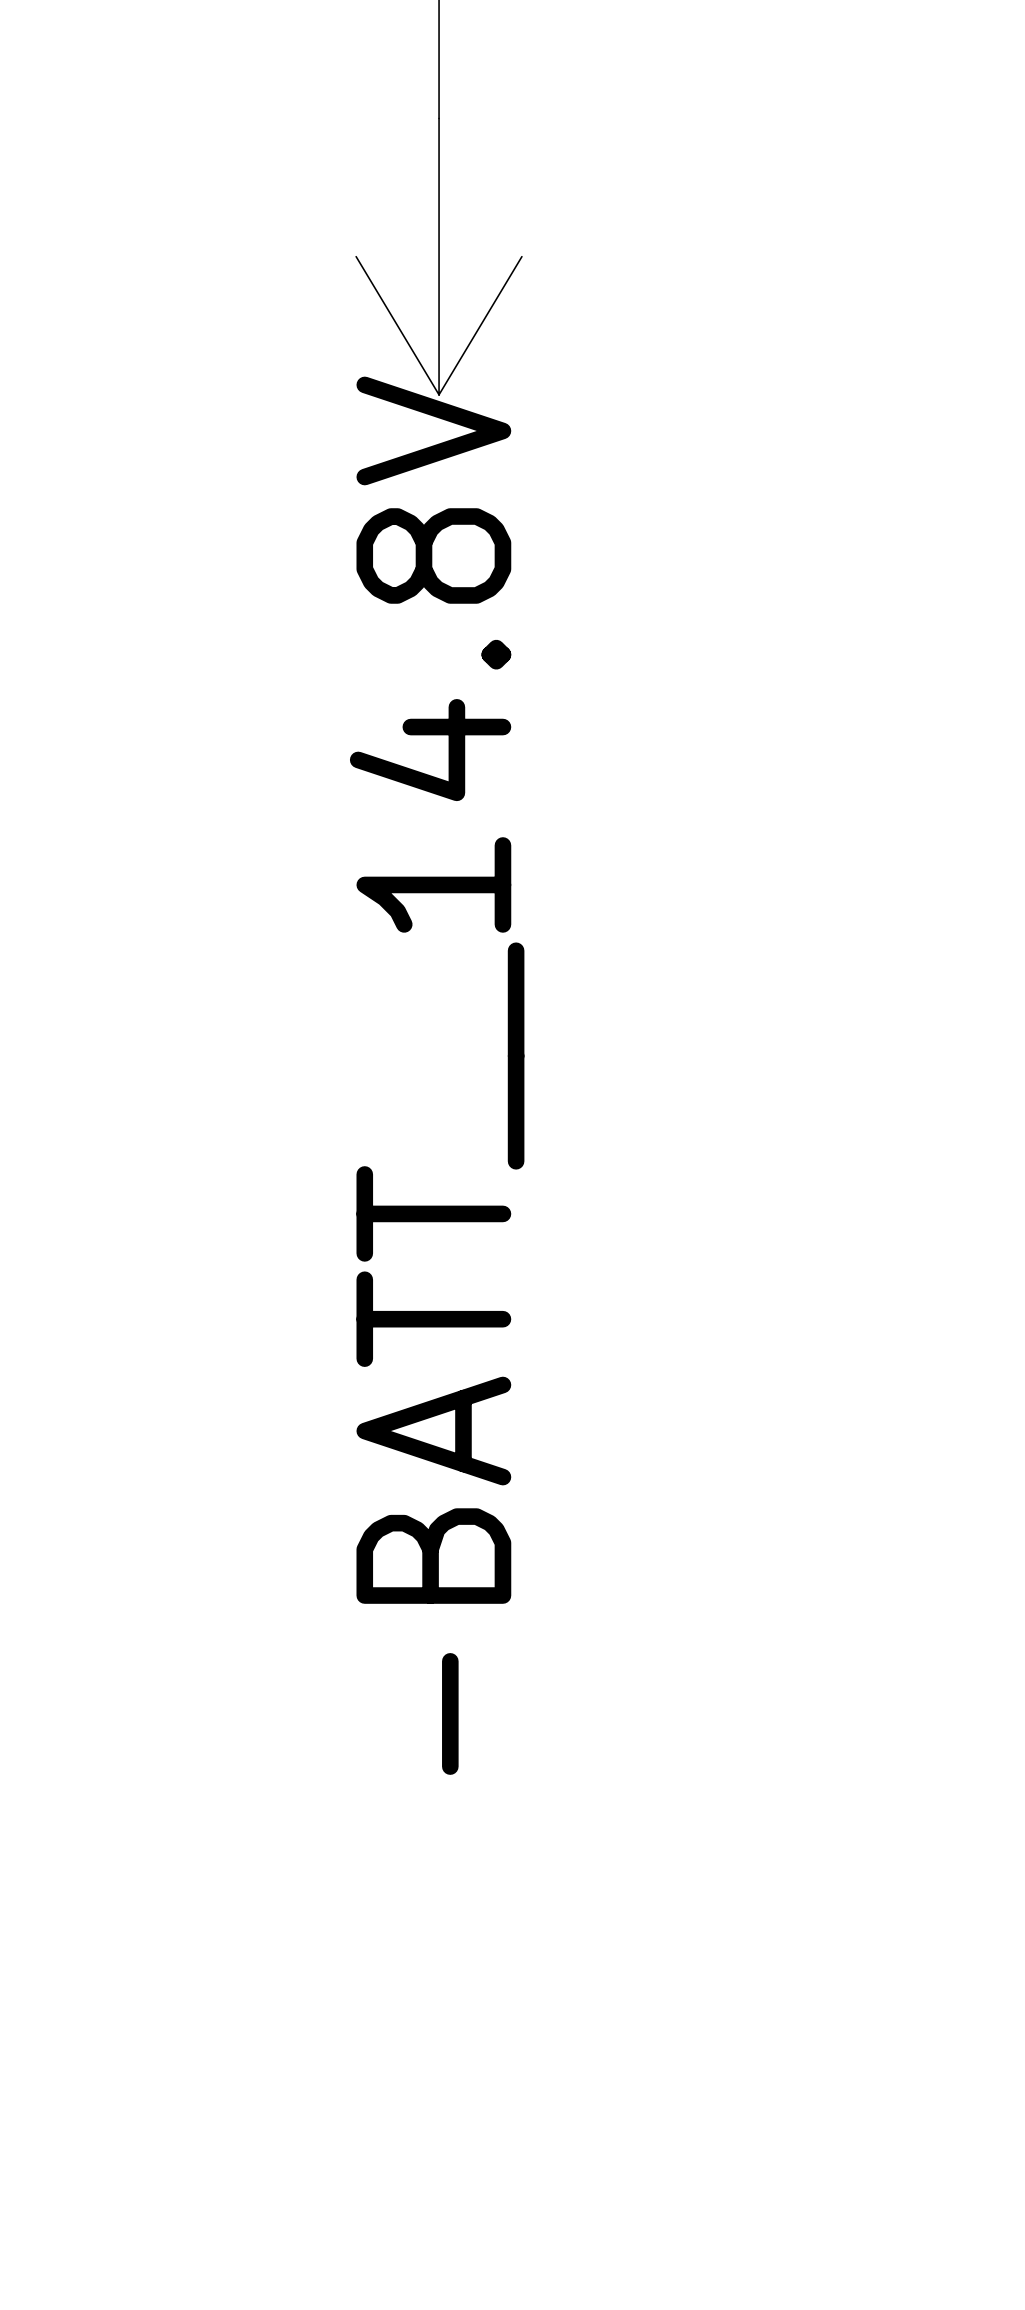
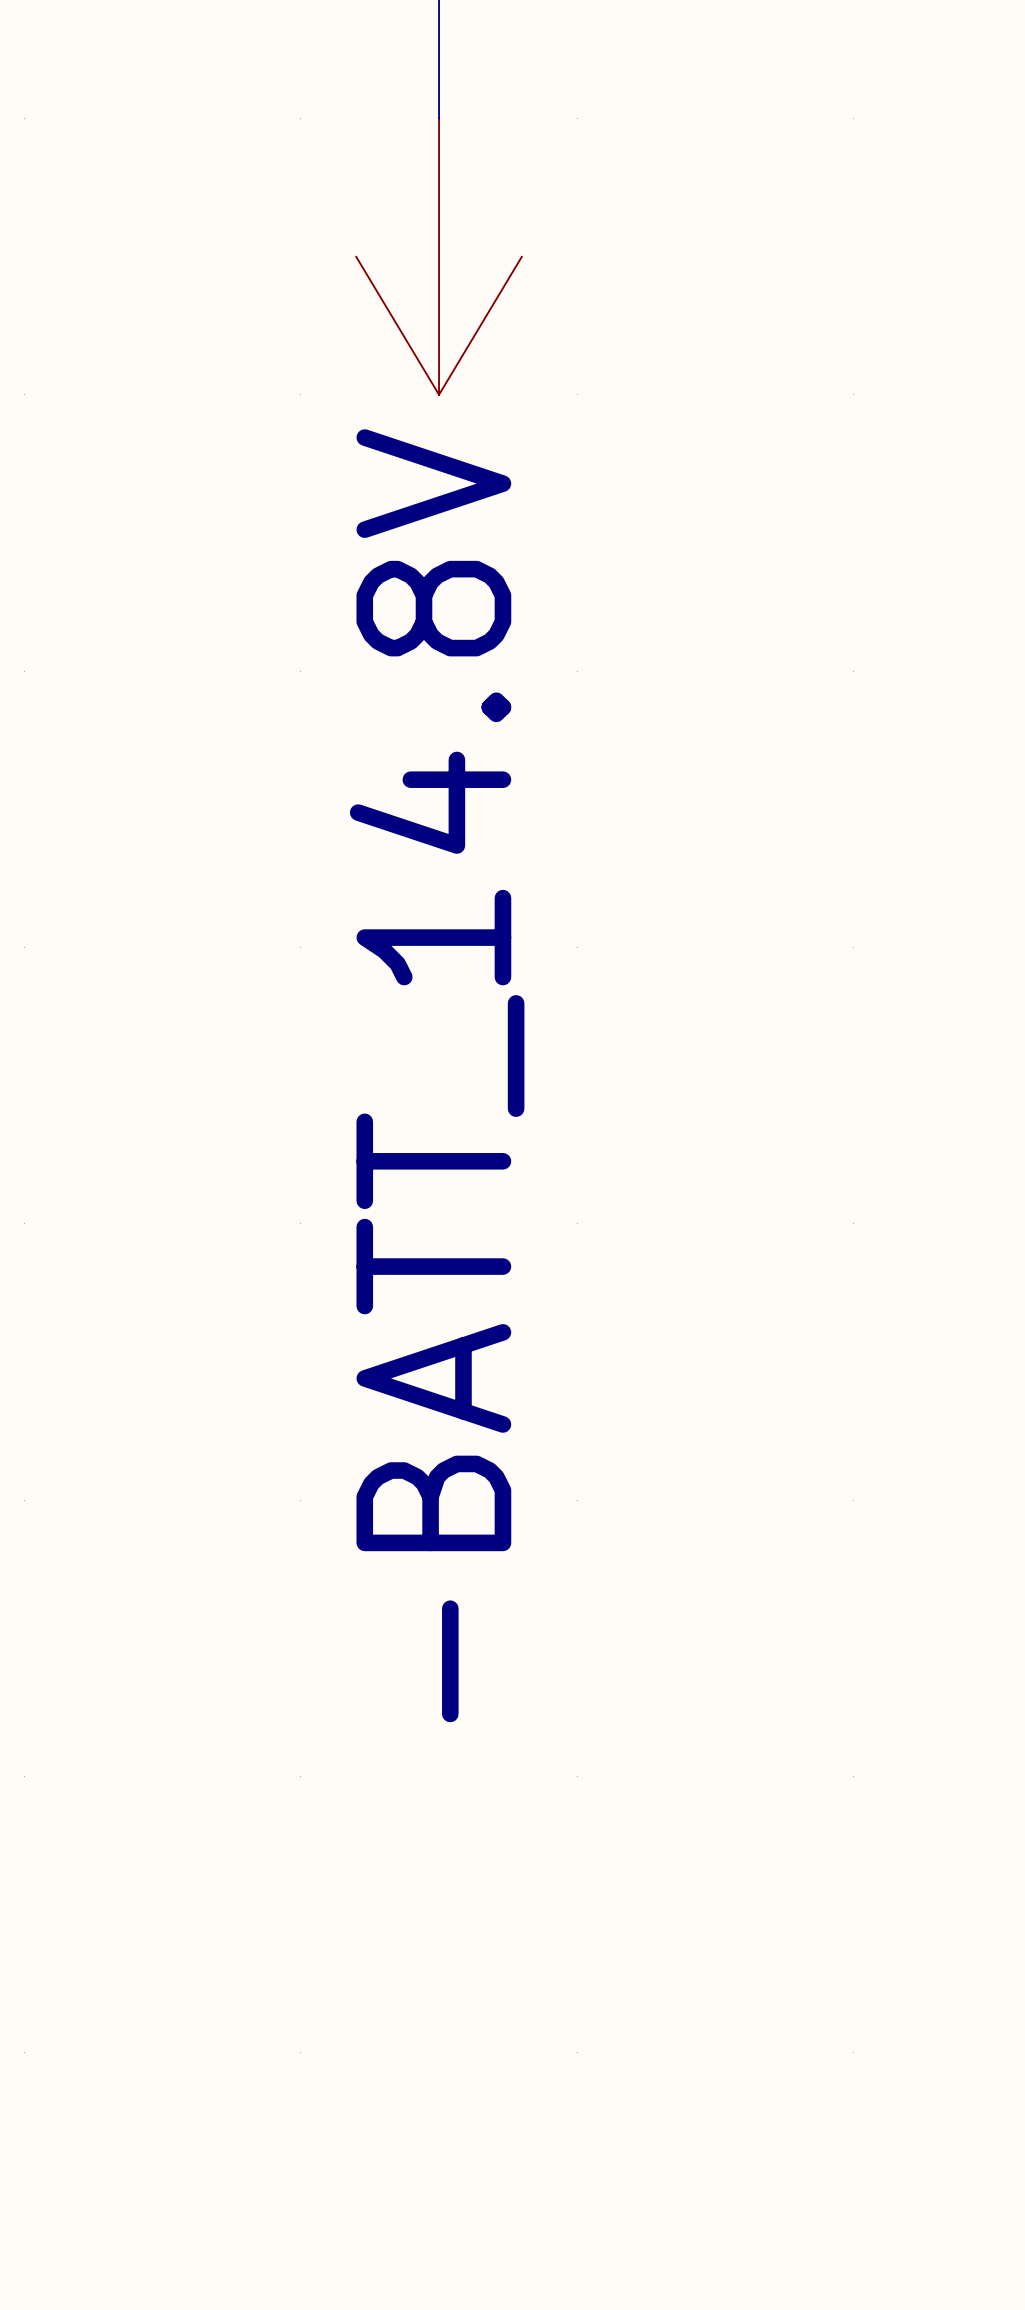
power symbol: -BATT__14.8V (439, 256) -> -BATT_14.8V (439, 256)

